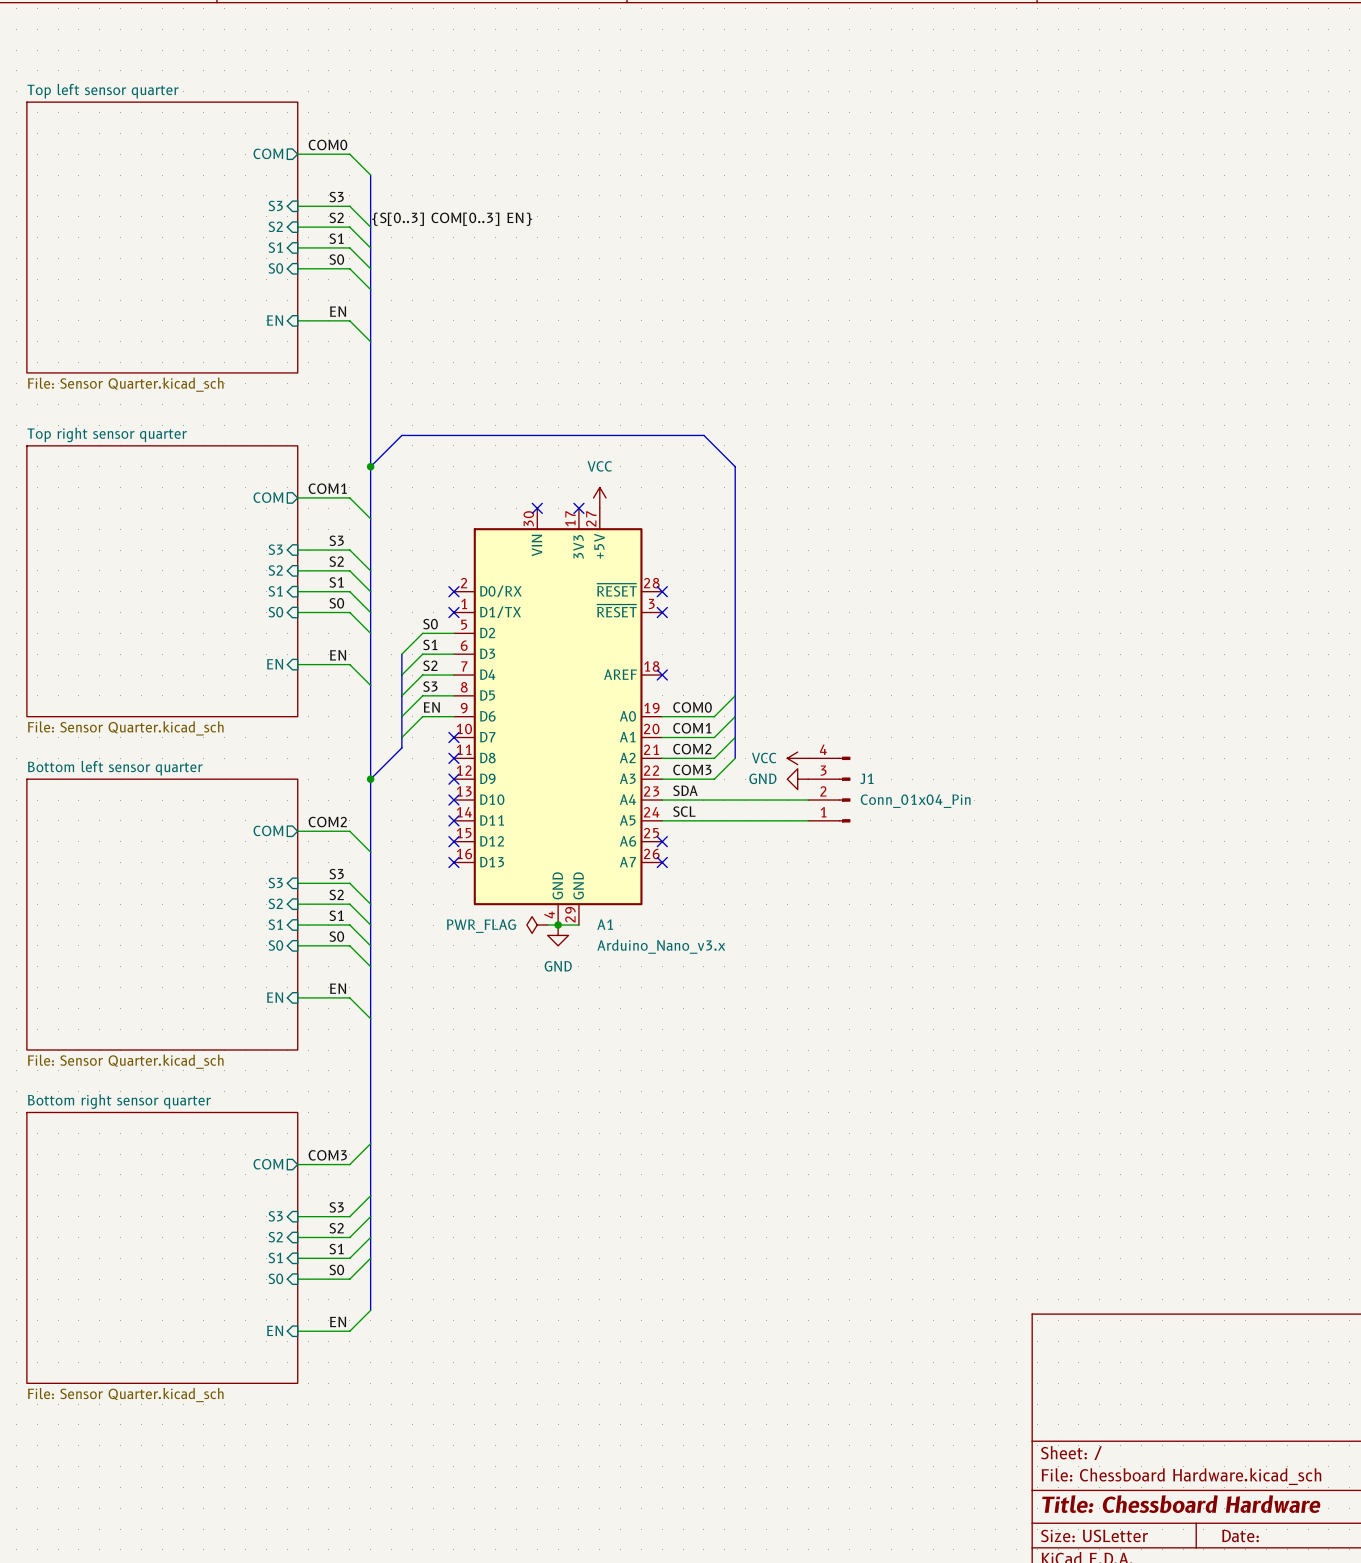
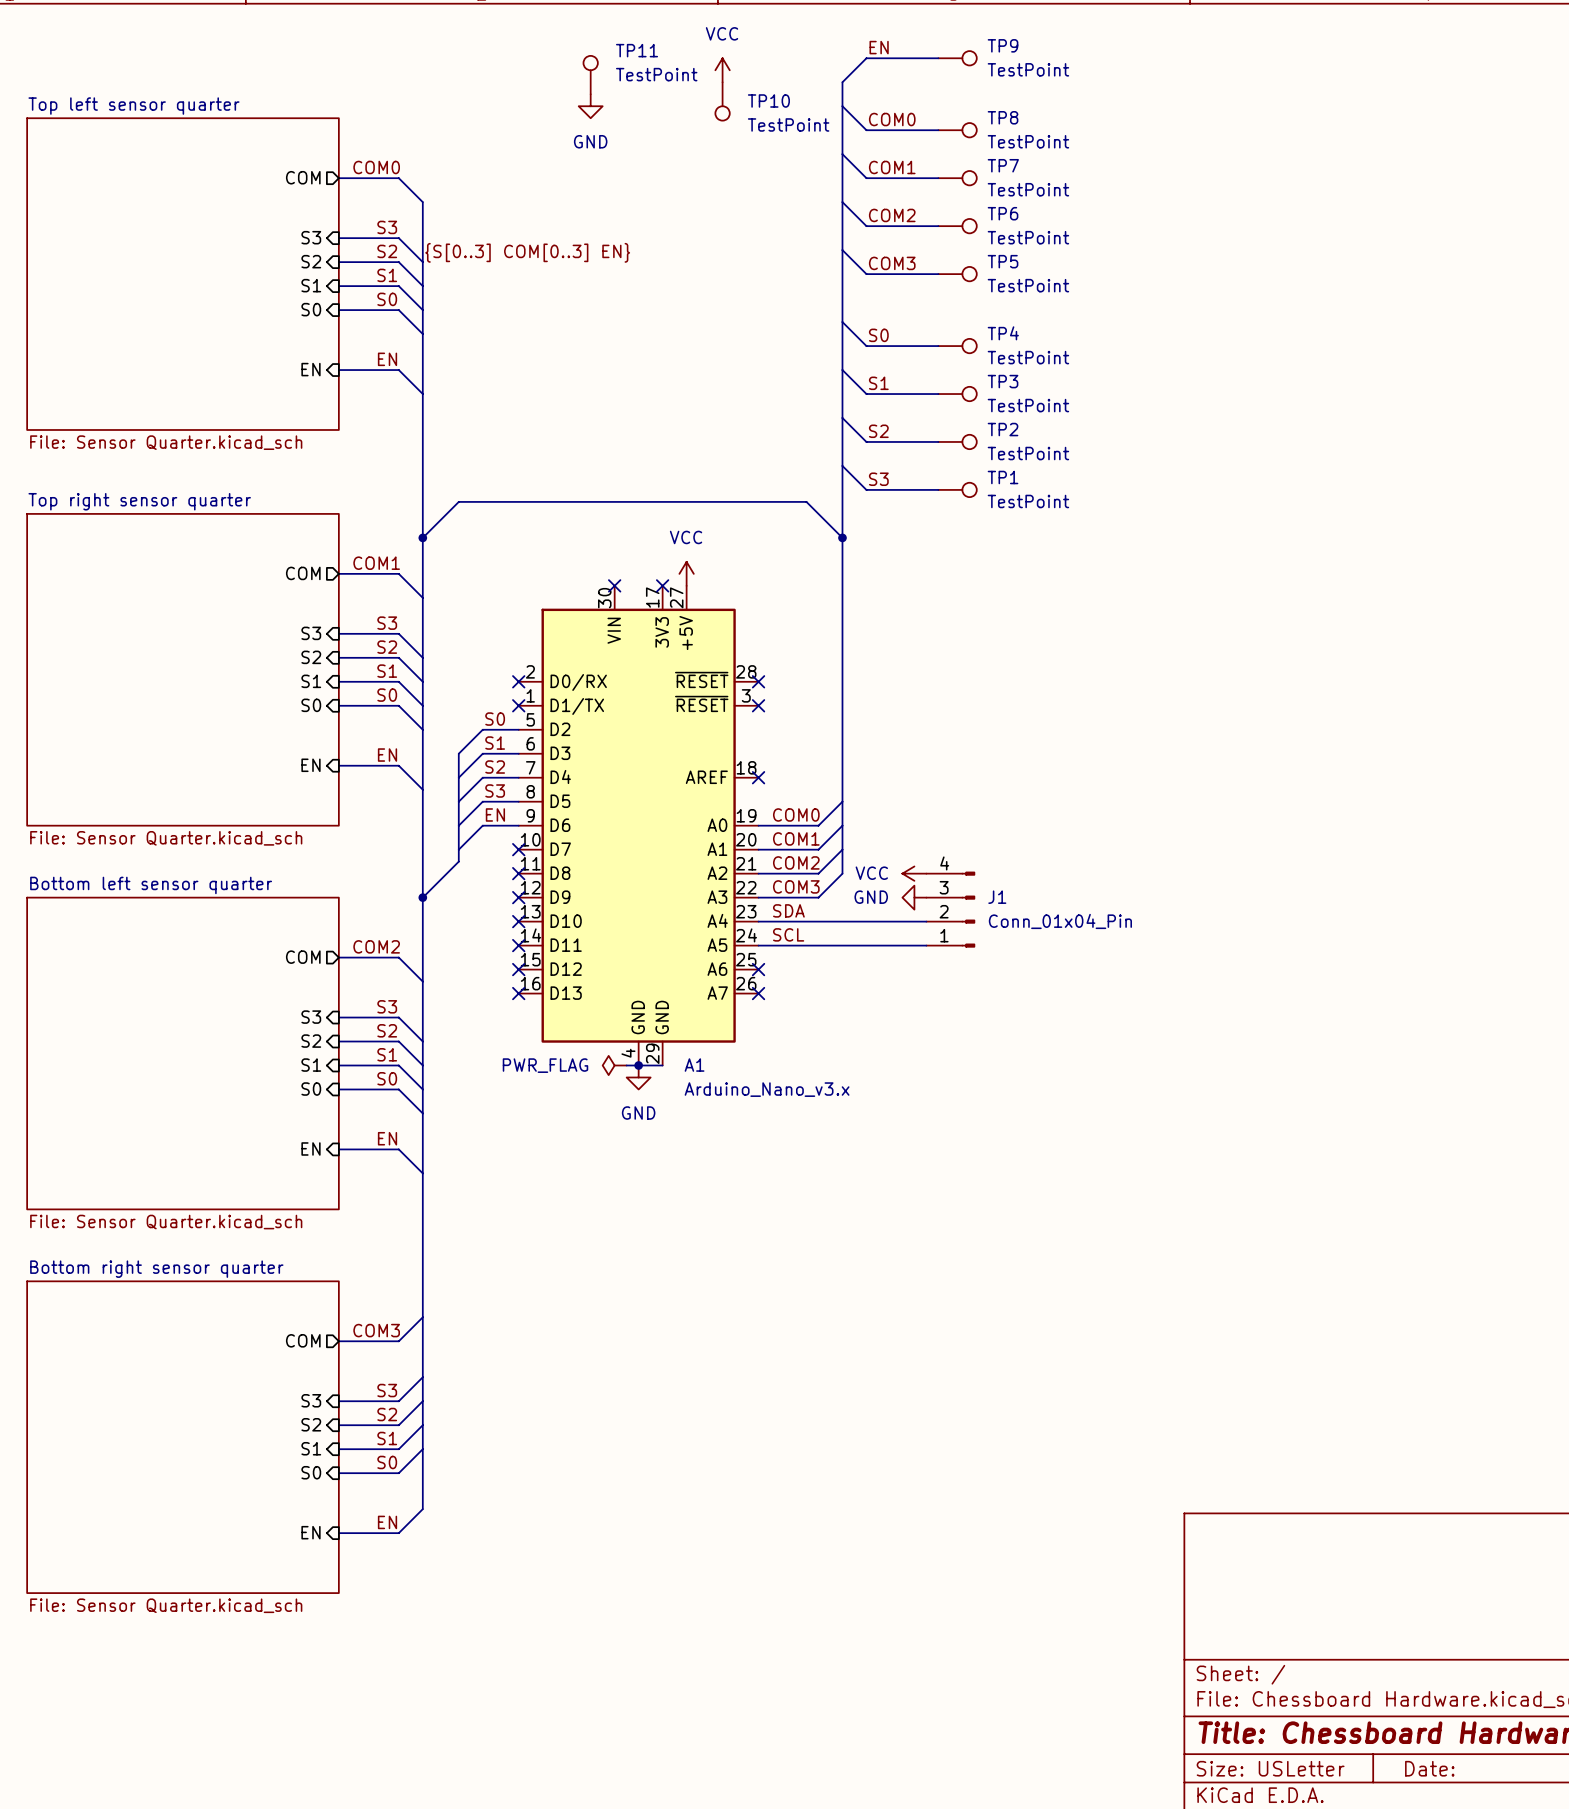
label: none -> EN (879, 47)
wire: none -> (938, 58) (866, 58) (842, 82)
TP9: none -> TestPoint (957, 58)
power symbol: none -> VCC (722, 70)
TP11: none -> TestPoint (590, 75)
bus: none -> (842, 82) (842, 537)
TP10: none -> TestPoint (722, 101)
power symbol: none -> GND (590, 106)
wire: none -> (842, 106) (866, 130) (938, 130)
label: none -> COM0 (892, 119)
TP8: none -> TestPoint (957, 130)
wire: none -> (842, 154) (866, 178) (938, 178)
label: none -> COM1 (892, 167)
TP7: none -> TestPoint (957, 178)
wire: none -> (842, 202) (866, 226) (938, 226)
label: none -> COM2 (892, 215)
TP6: none -> TestPoint (957, 226)
wire: none -> (842, 250) (866, 274) (938, 274)
label: none -> COM3 (892, 263)
TP5: none -> TestPoint (957, 274)
wire: none -> (842, 322) (866, 346) (938, 346)
label: none -> S0 (878, 335)
TP4: none -> TestPoint (957, 346)
wire: none -> (842, 370) (866, 394) (938, 394)
label: none -> S1 (878, 383)
TP3: none -> TestPoint (957, 394)
wire: none -> (842, 418) (866, 441) (938, 441)
label: none -> S2 (878, 431)
TP2: none -> TestPoint (957, 441)
wire: none -> (842, 465) (866, 489) (938, 489)
label: none -> S3 (878, 479)
TP1: none -> TestPoint (957, 489)
junction: none -> (842, 537)

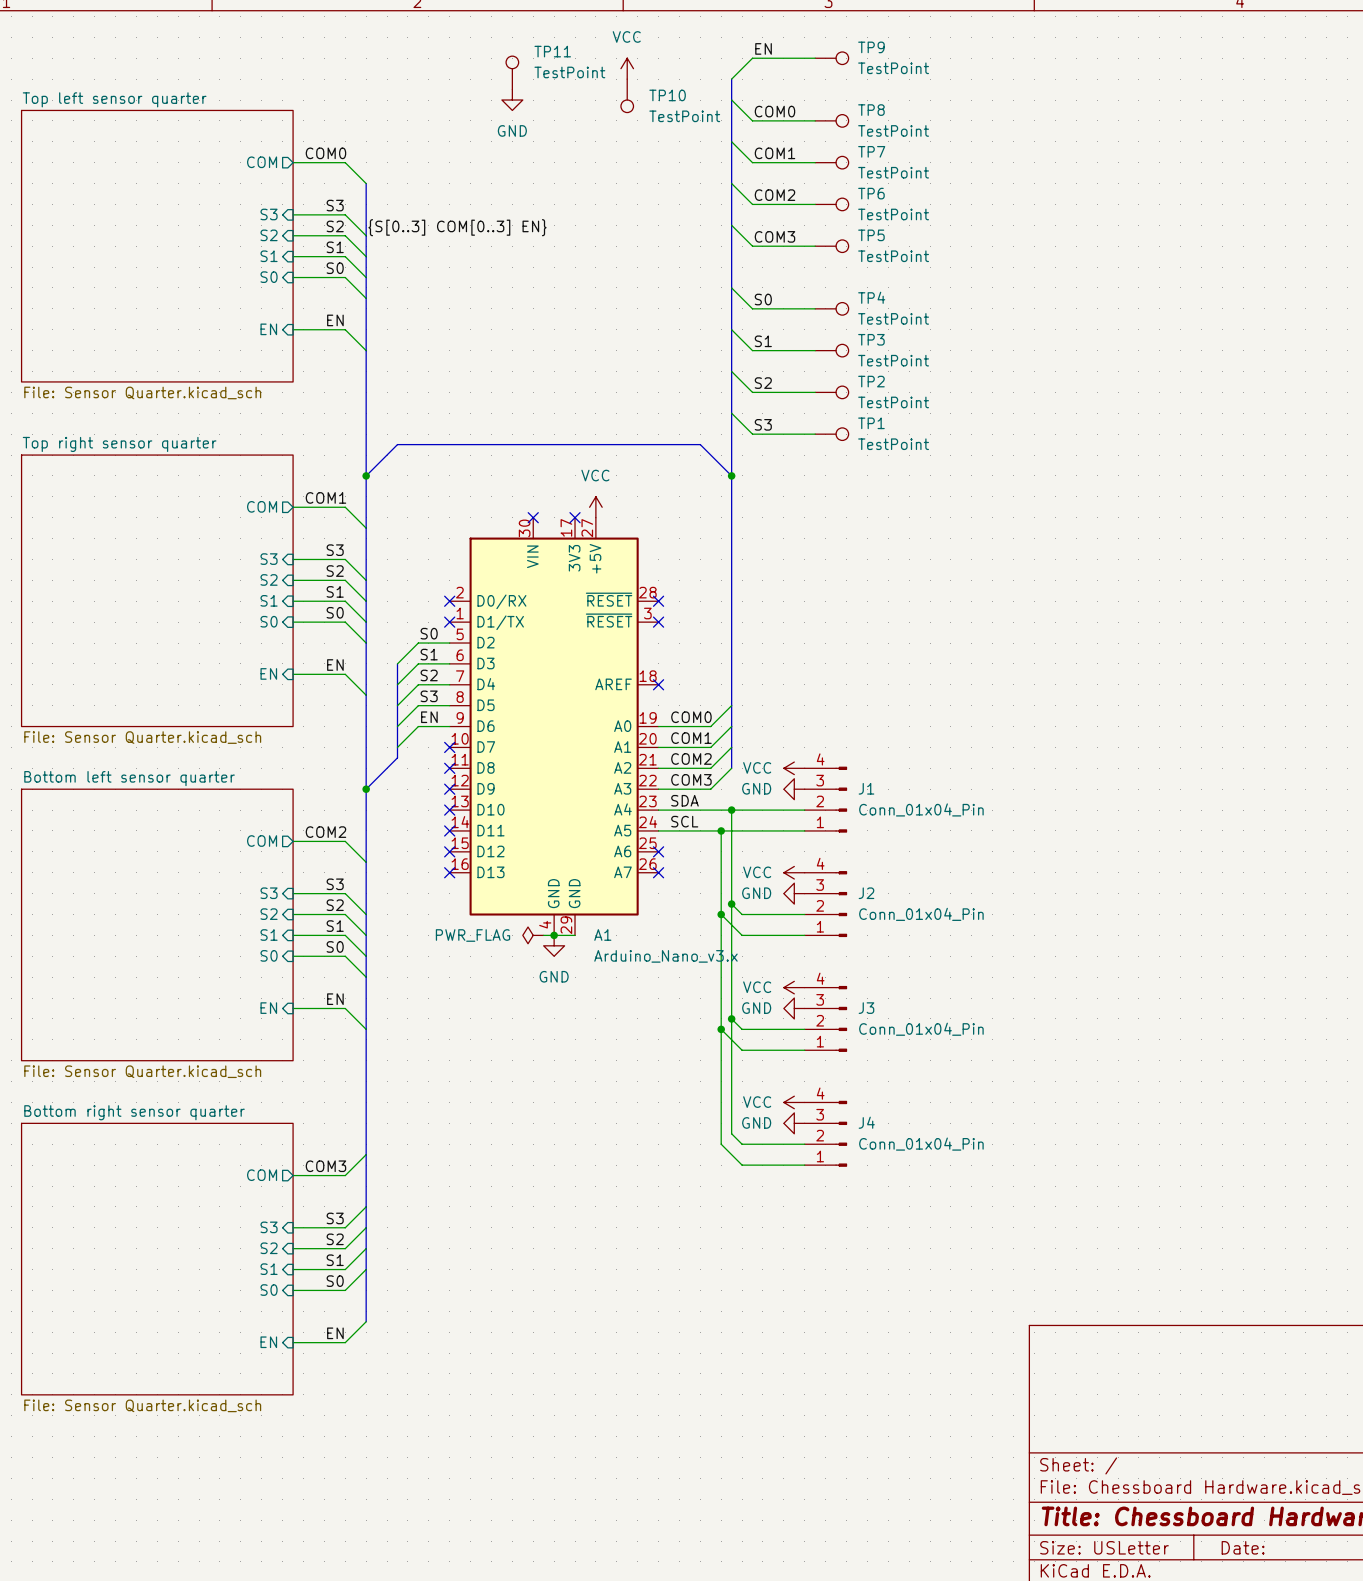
wire: none -> (731, 810) (731, 1133) (742, 1144) (804, 1144)
junction: none -> (731, 810)
wire: none -> (721, 830) (721, 1144) (742, 1165) (804, 1165)
junction: none -> (721, 830)
power symbol: none -> VCC (794, 872)
power symbol: none -> GND (794, 893)
wire: none -> (731, 904) (742, 914) (804, 914)
junction: none -> (731, 904)
J2: none -> Conn_01x04_Pin (825, 904)
wire: none -> (721, 914) (742, 935) (804, 935)
junction: none -> (721, 914)
power symbol: none -> VCC (794, 987)
power symbol: none -> GND (794, 1008)
wire: none -> (731, 1018) (742, 1029) (804, 1029)
junction: none -> (731, 1018)
J3: none -> Conn_01x04_Pin (825, 1018)
wire: none -> (721, 1029) (742, 1050) (804, 1050)
junction: none -> (721, 1029)
power symbol: none -> VCC (794, 1102)
power symbol: none -> GND (794, 1123)
J4: none -> Conn_01x04_Pin (825, 1133)

